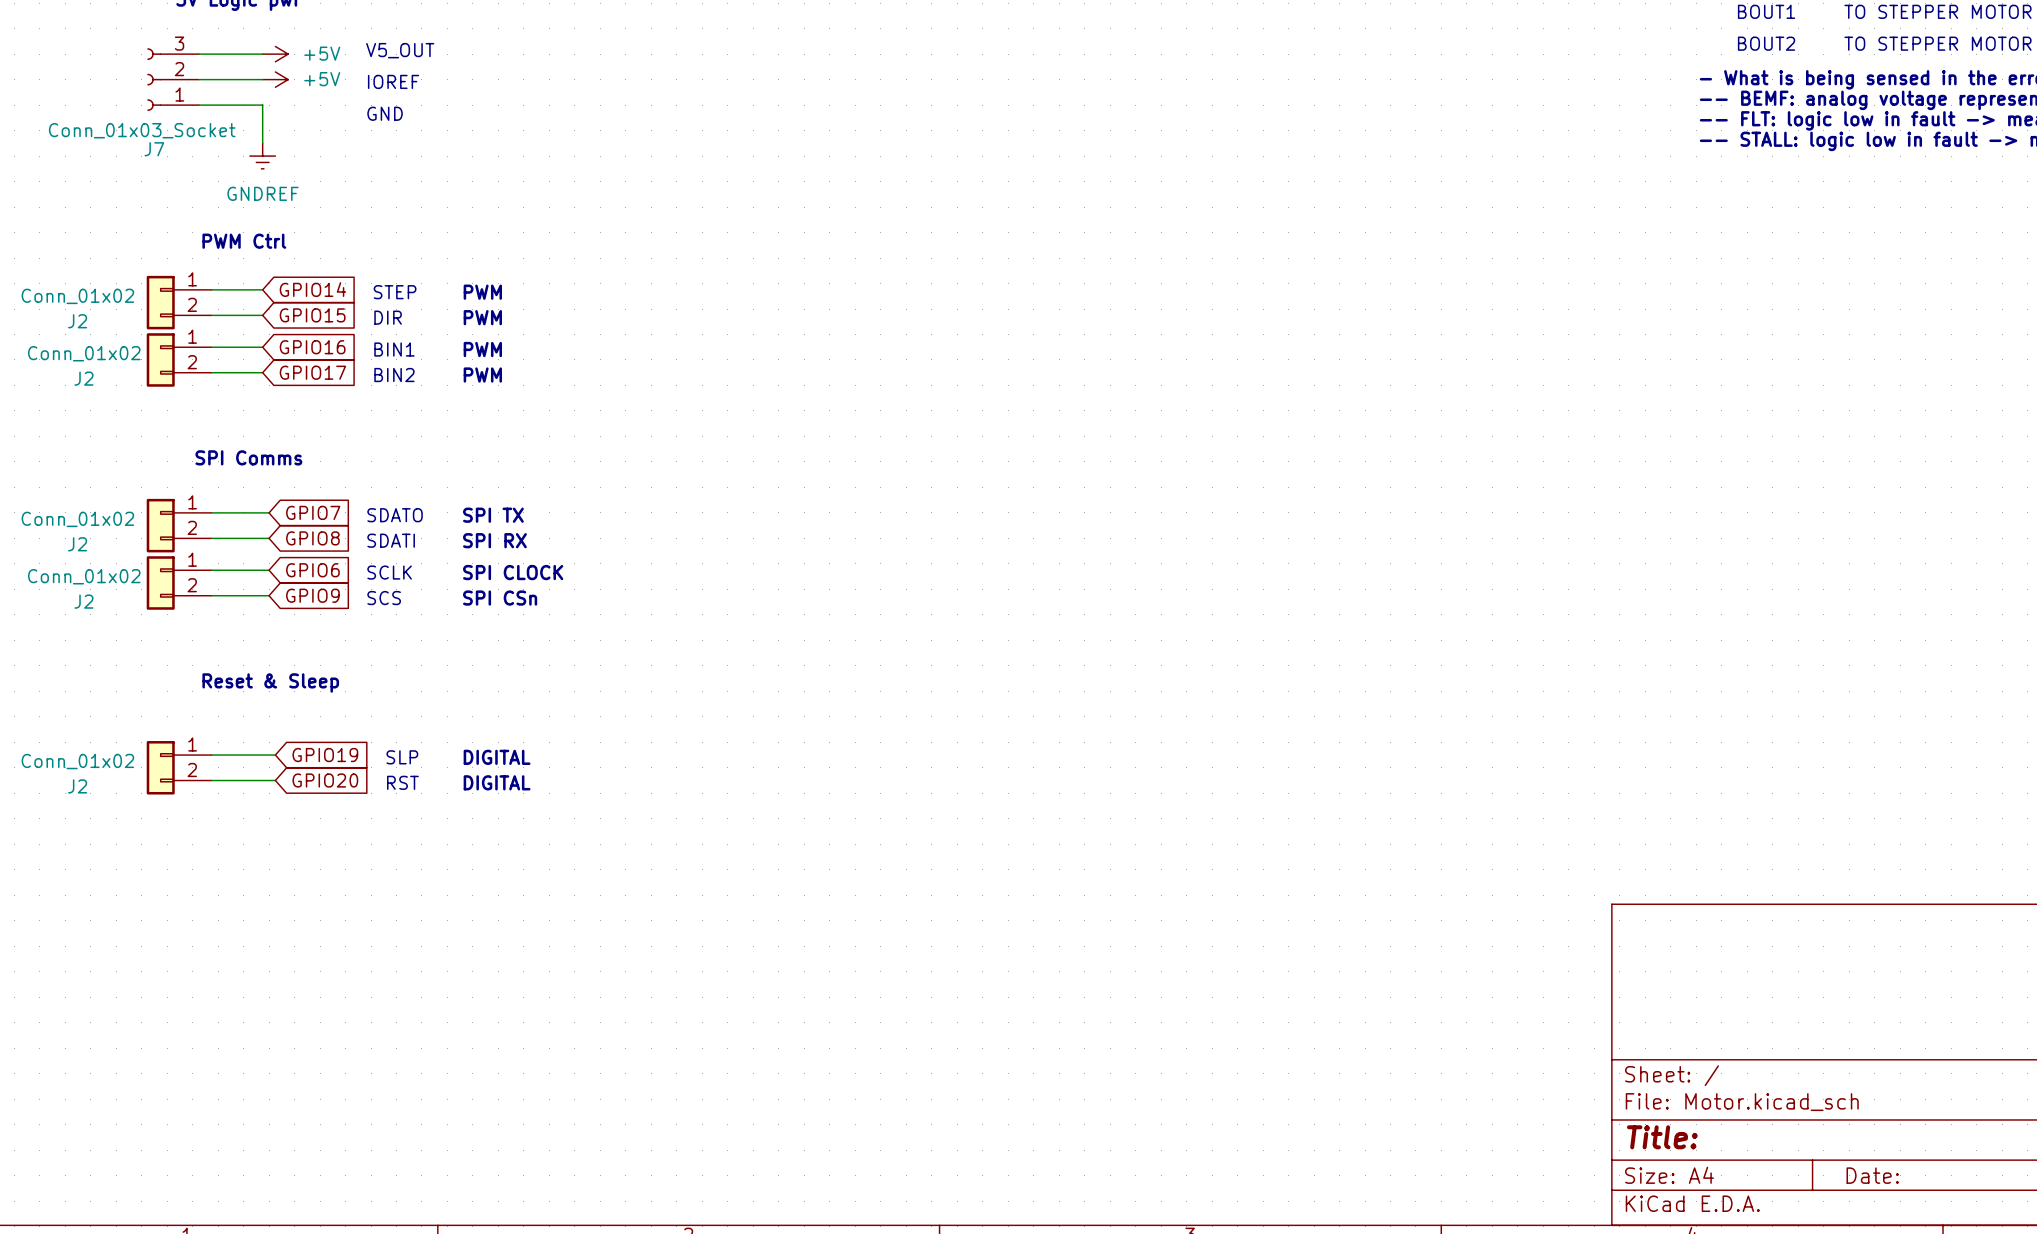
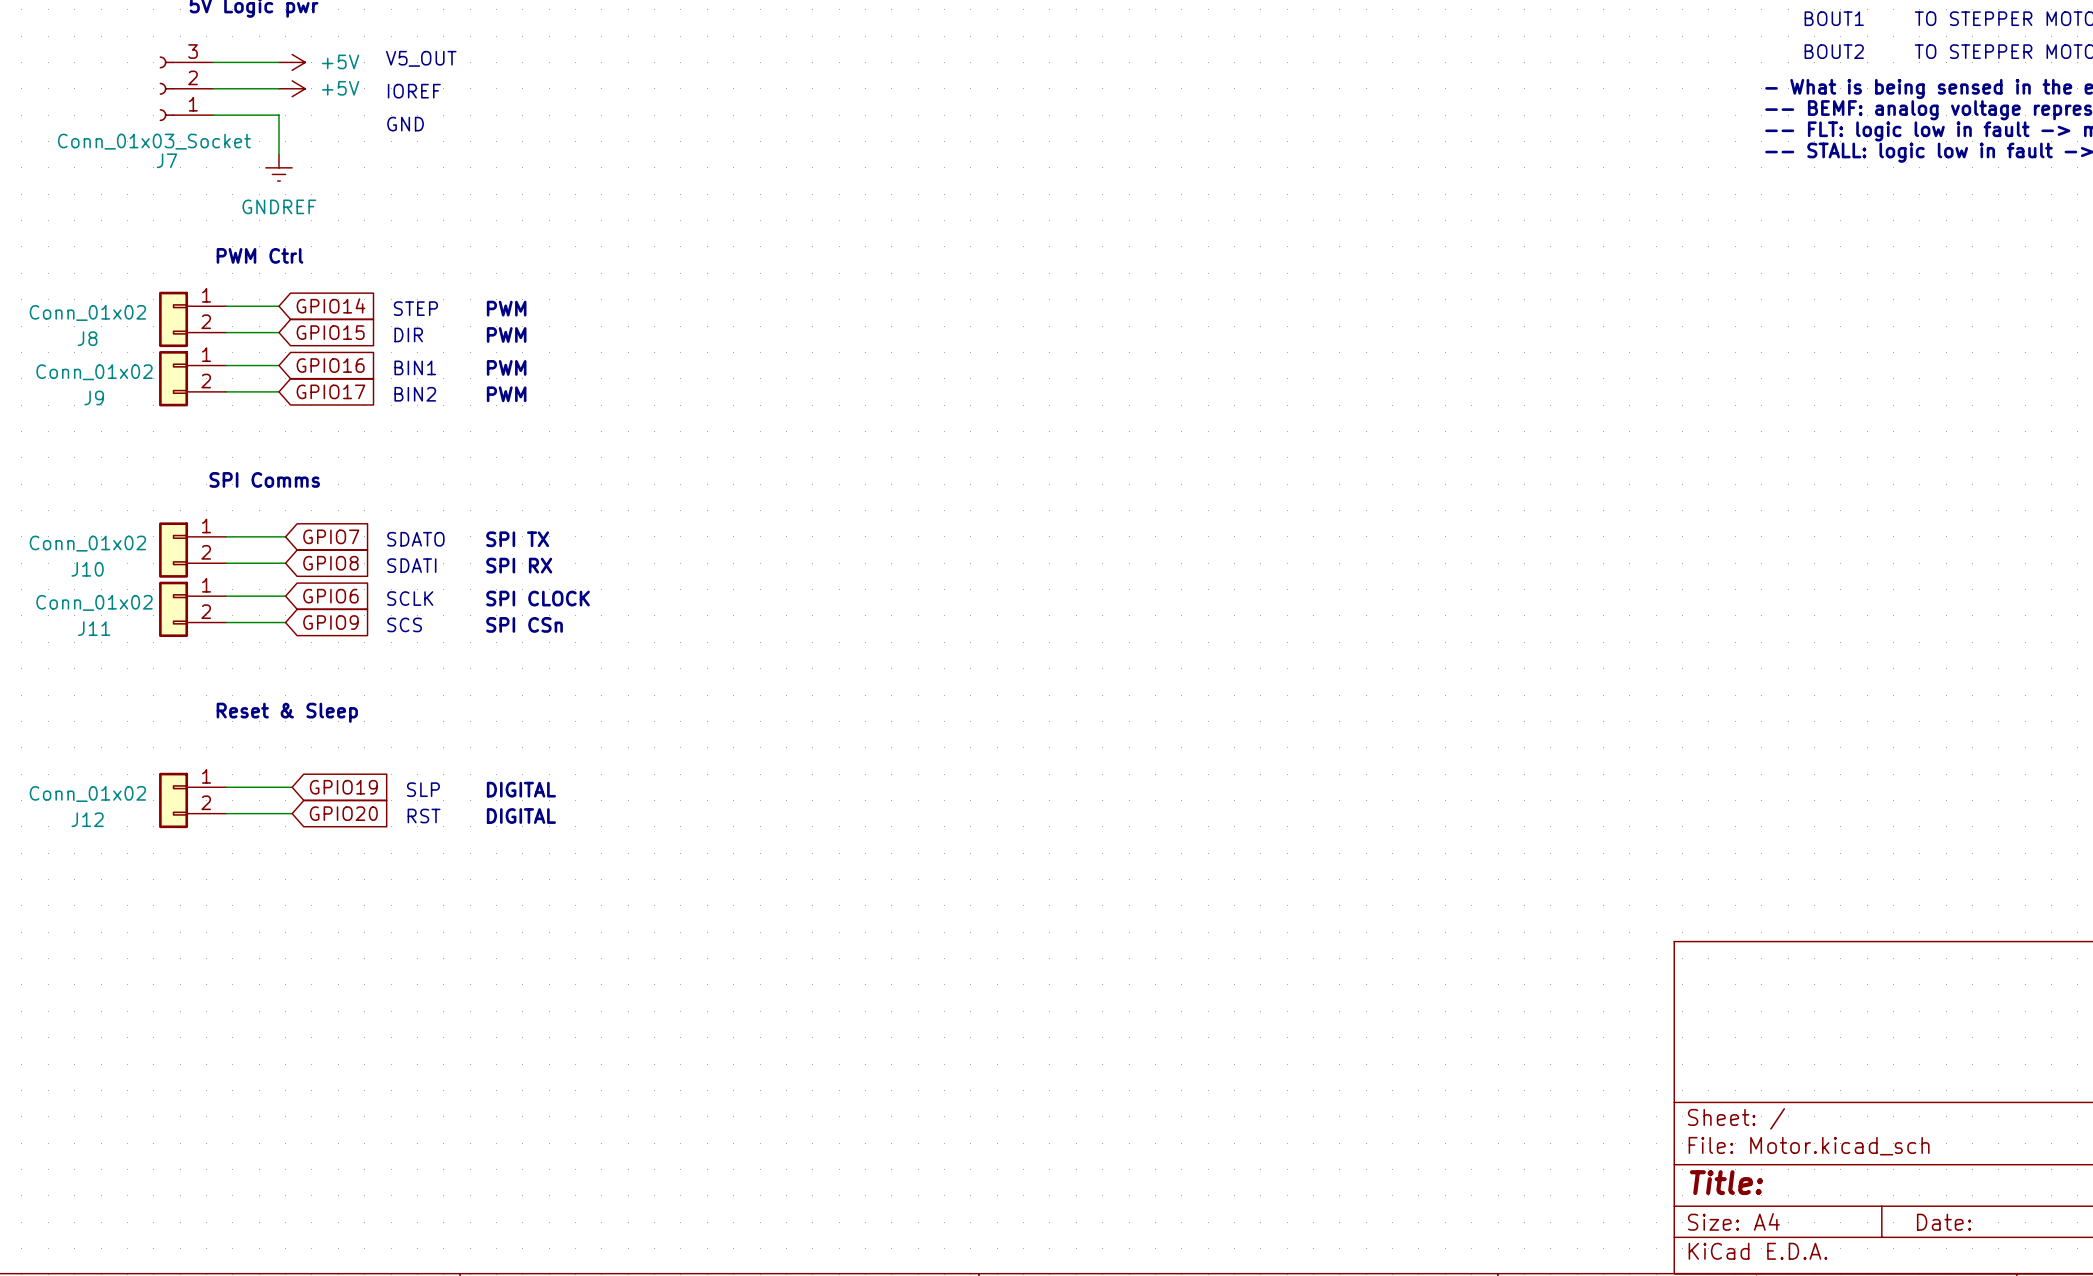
J2 name: J2 (77, 321) -> J8 (87, 338)
J2 name: J2 (83, 378) -> J9 (94, 397)
J2 name: J2 (77, 544) -> J10 (87, 569)
J2 name: J2 (83, 601) -> J11 (94, 628)
J2 name: J2 (77, 786) -> J12 (87, 819)

